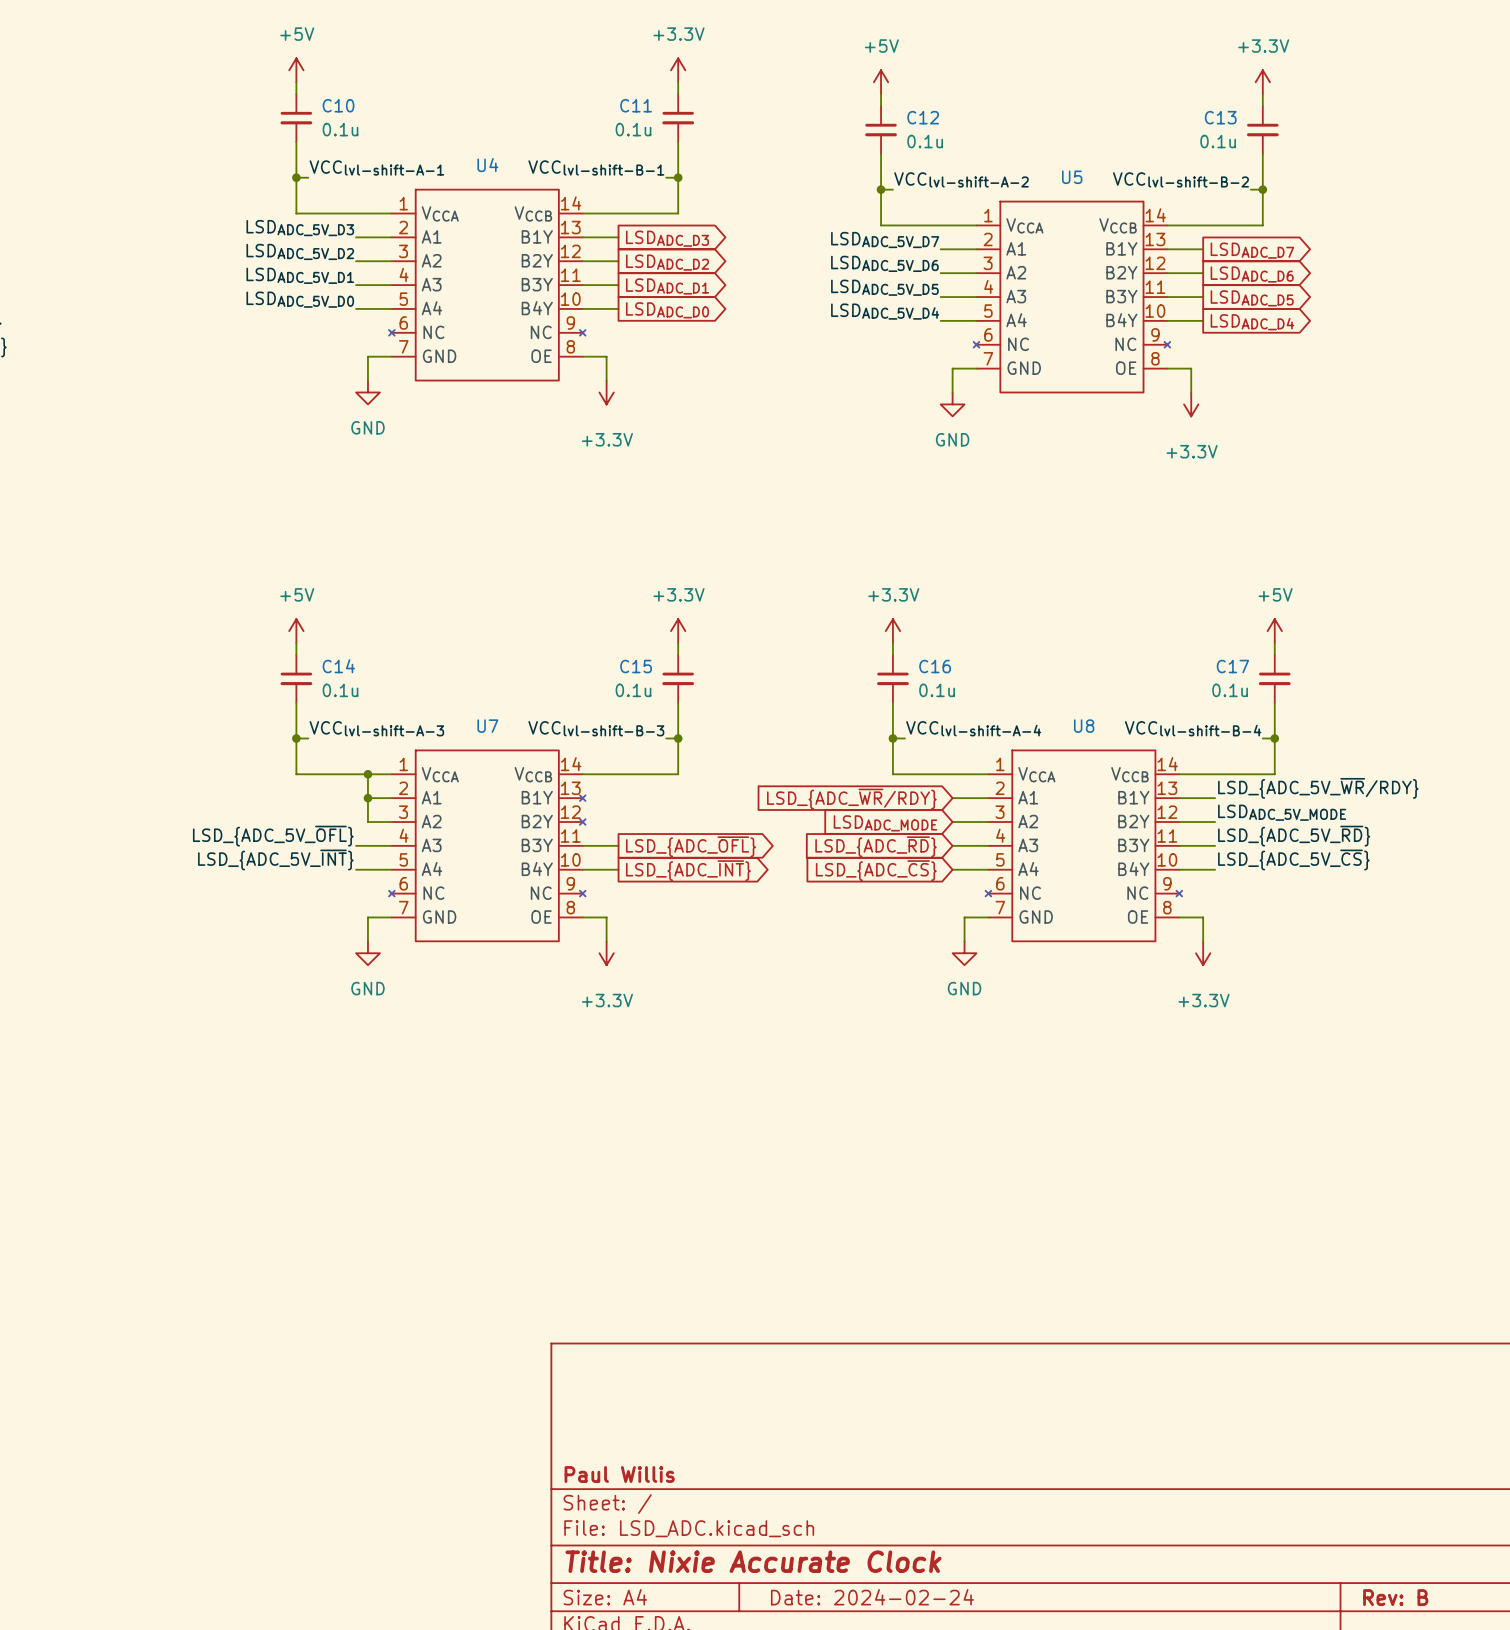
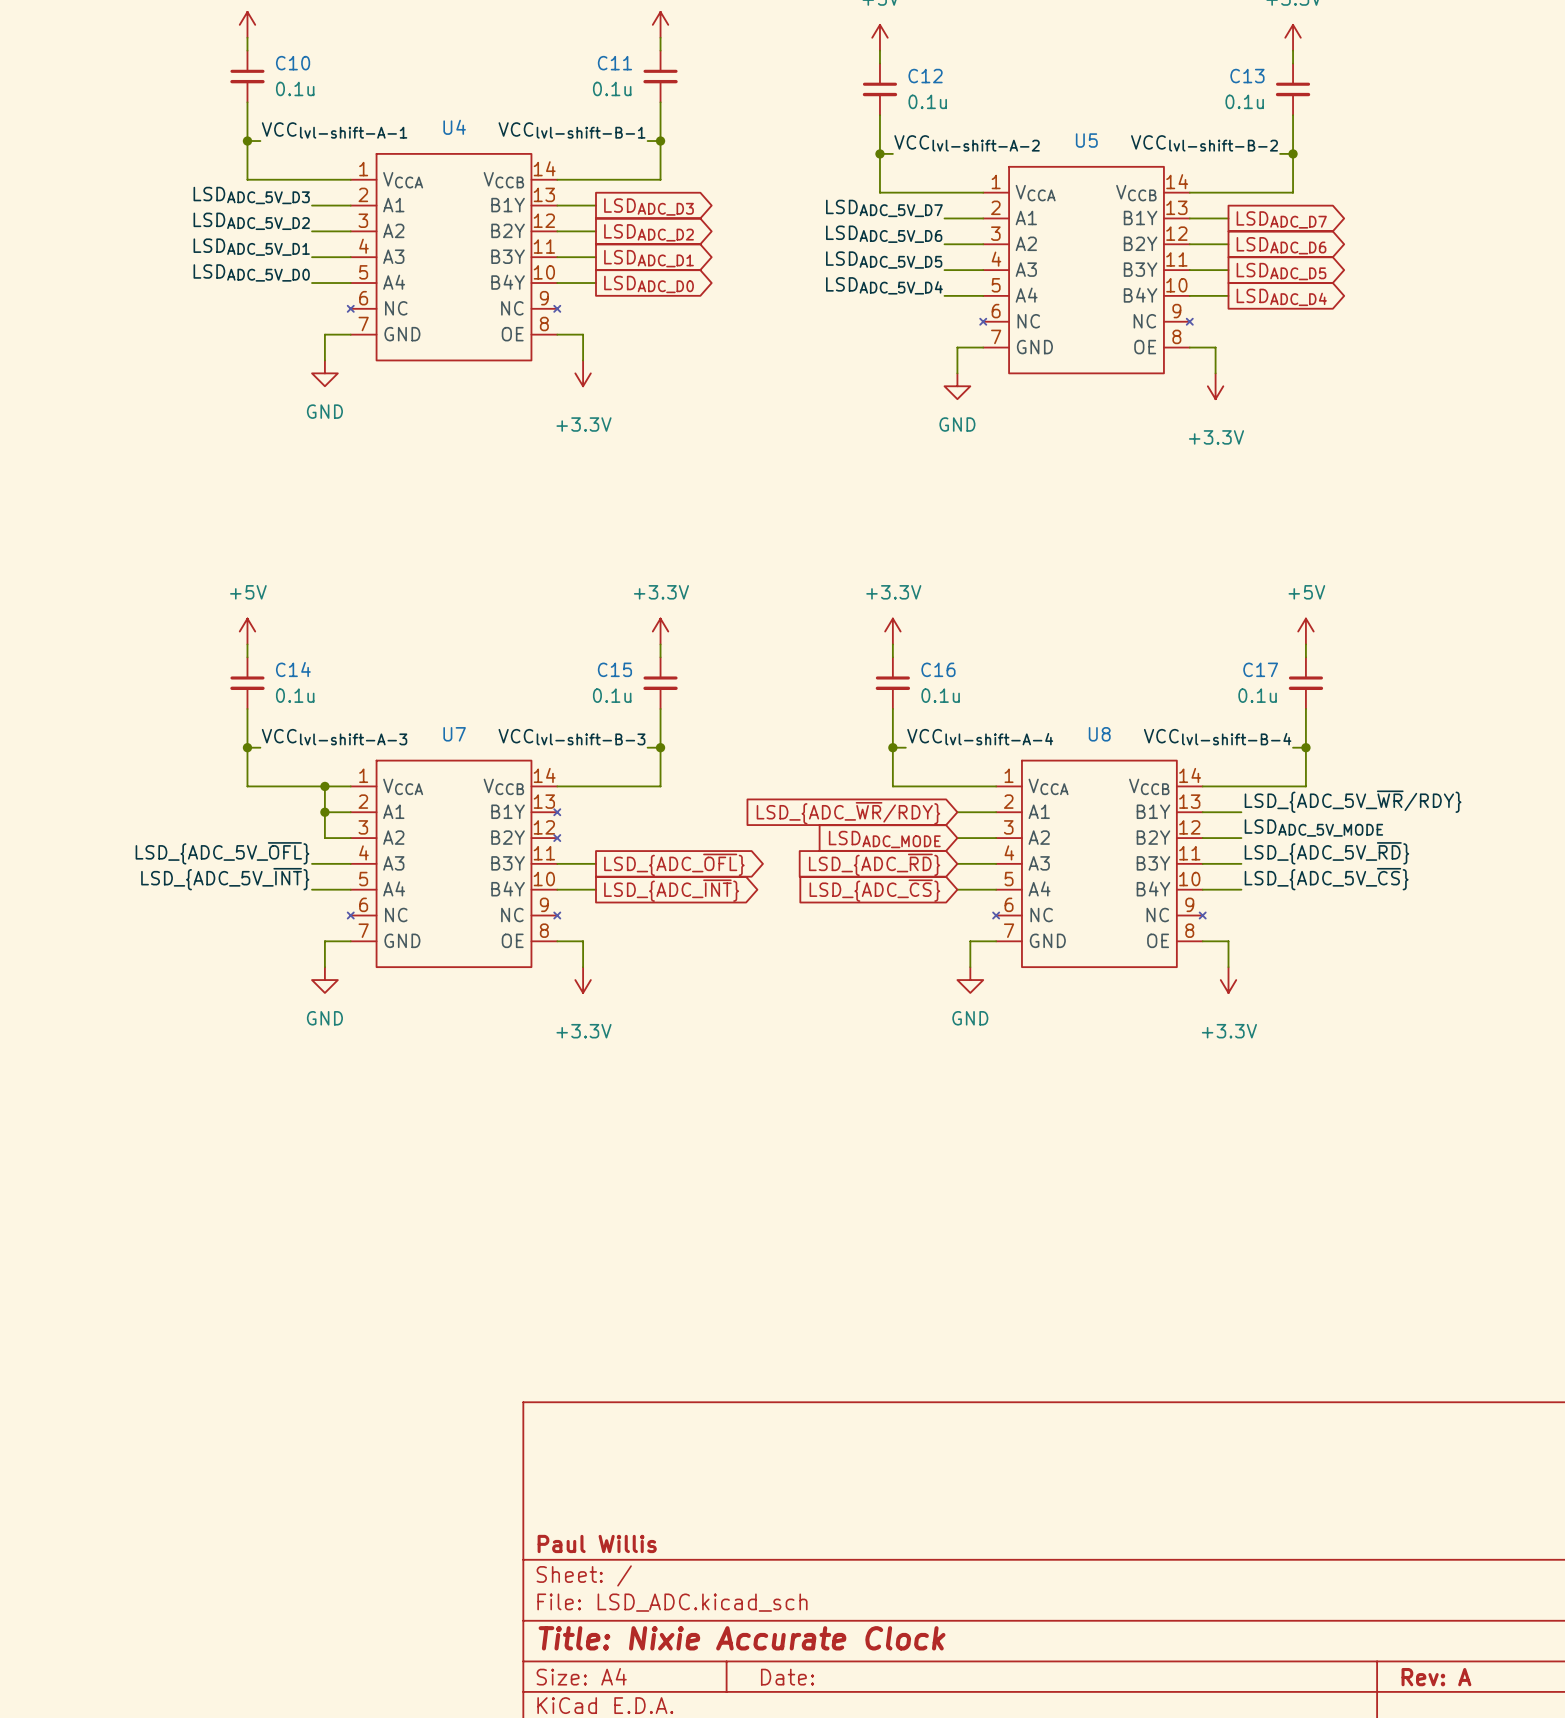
title block: Date: 2024-02-24 (872, 1597) -> Date: (787, 1677)
title block: Rev: B (1395, 1597) -> Rev: A (1436, 1677)

